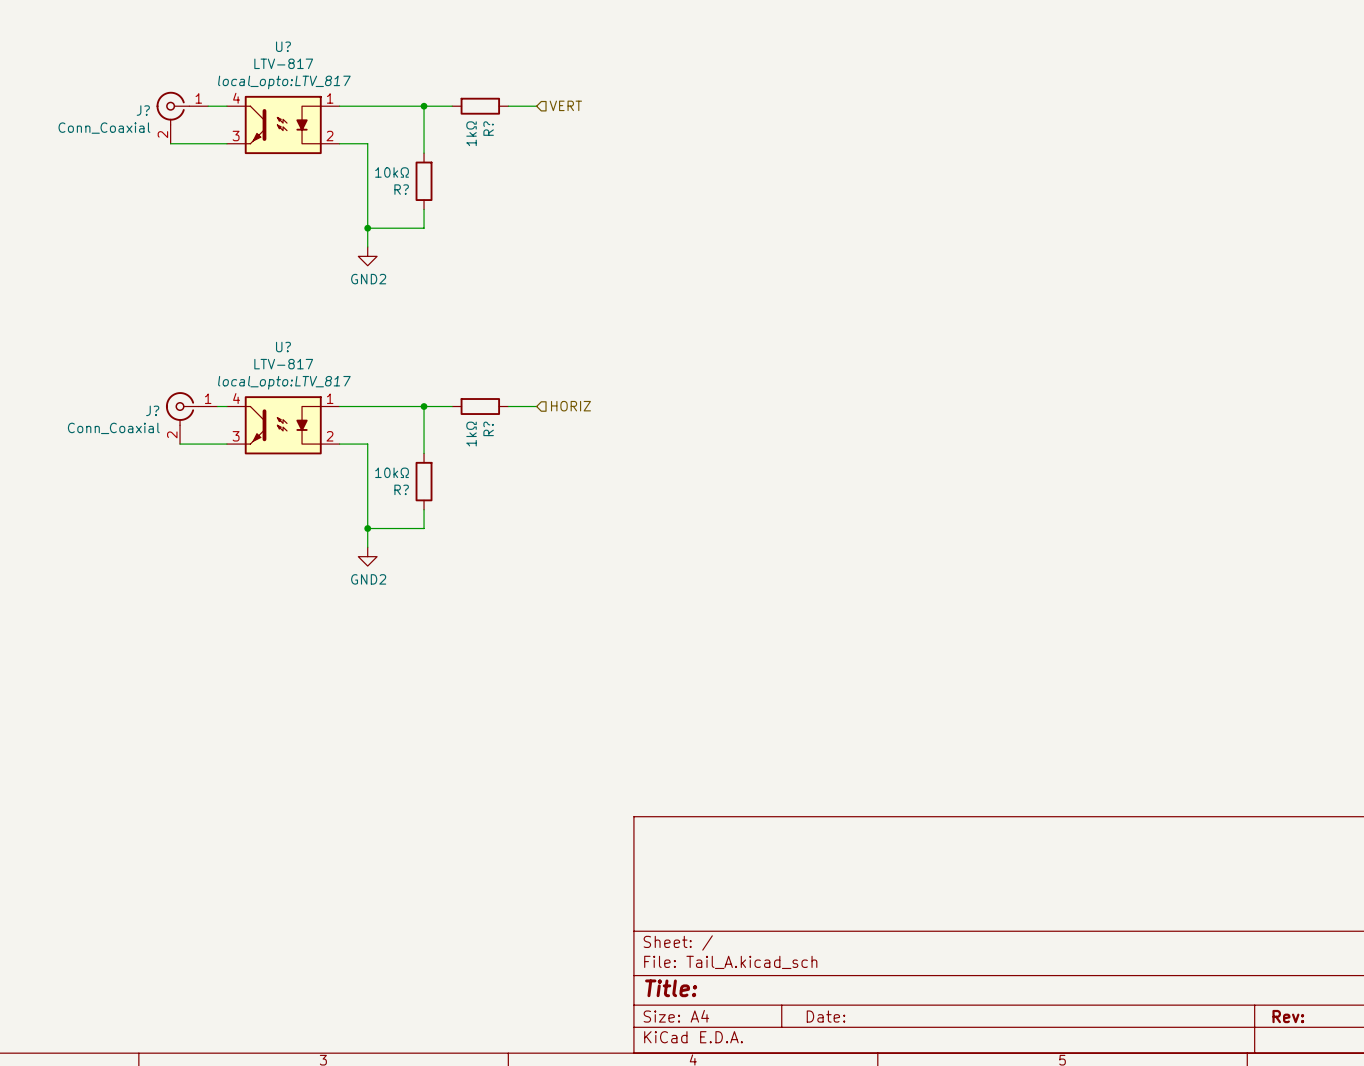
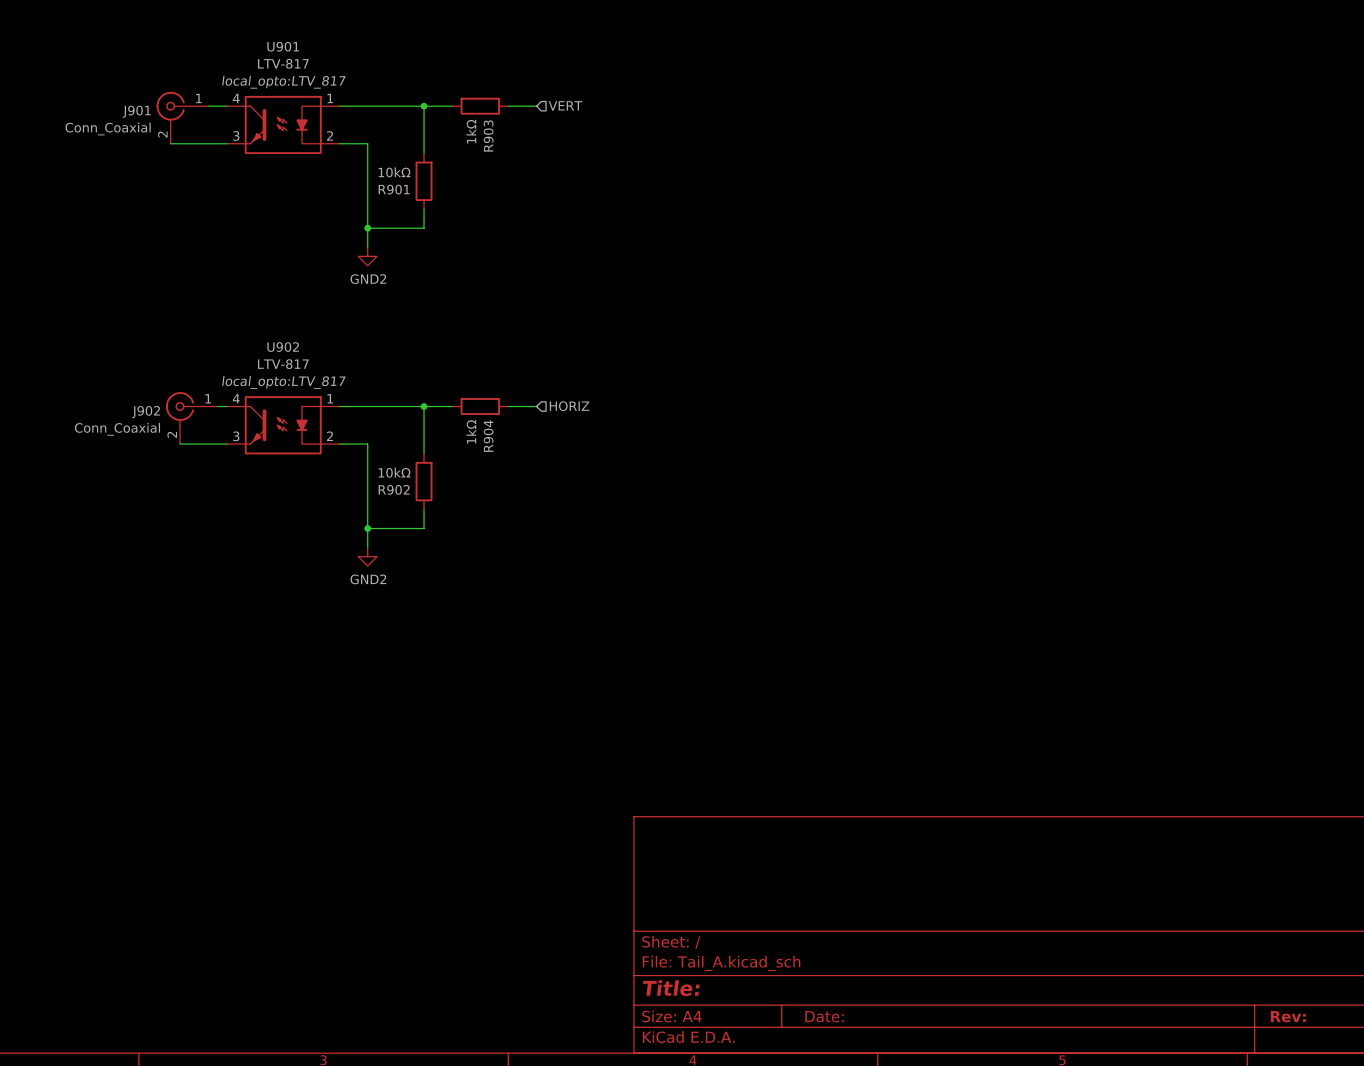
U? name: U? (283, 46) -> U901 (283, 46)
J? name: J? (143, 110) -> J901 (136, 111)
R? name: R? (488, 128) -> R903 (488, 135)
R? name: R? (401, 189) -> R901 (394, 189)
U? name: U? (283, 347) -> U902 (283, 347)
J? name: J? (152, 410) -> J902 (146, 412)
R? name: R? (488, 428) -> R904 (488, 436)
R? name: R? (401, 489) -> R902 (394, 489)

